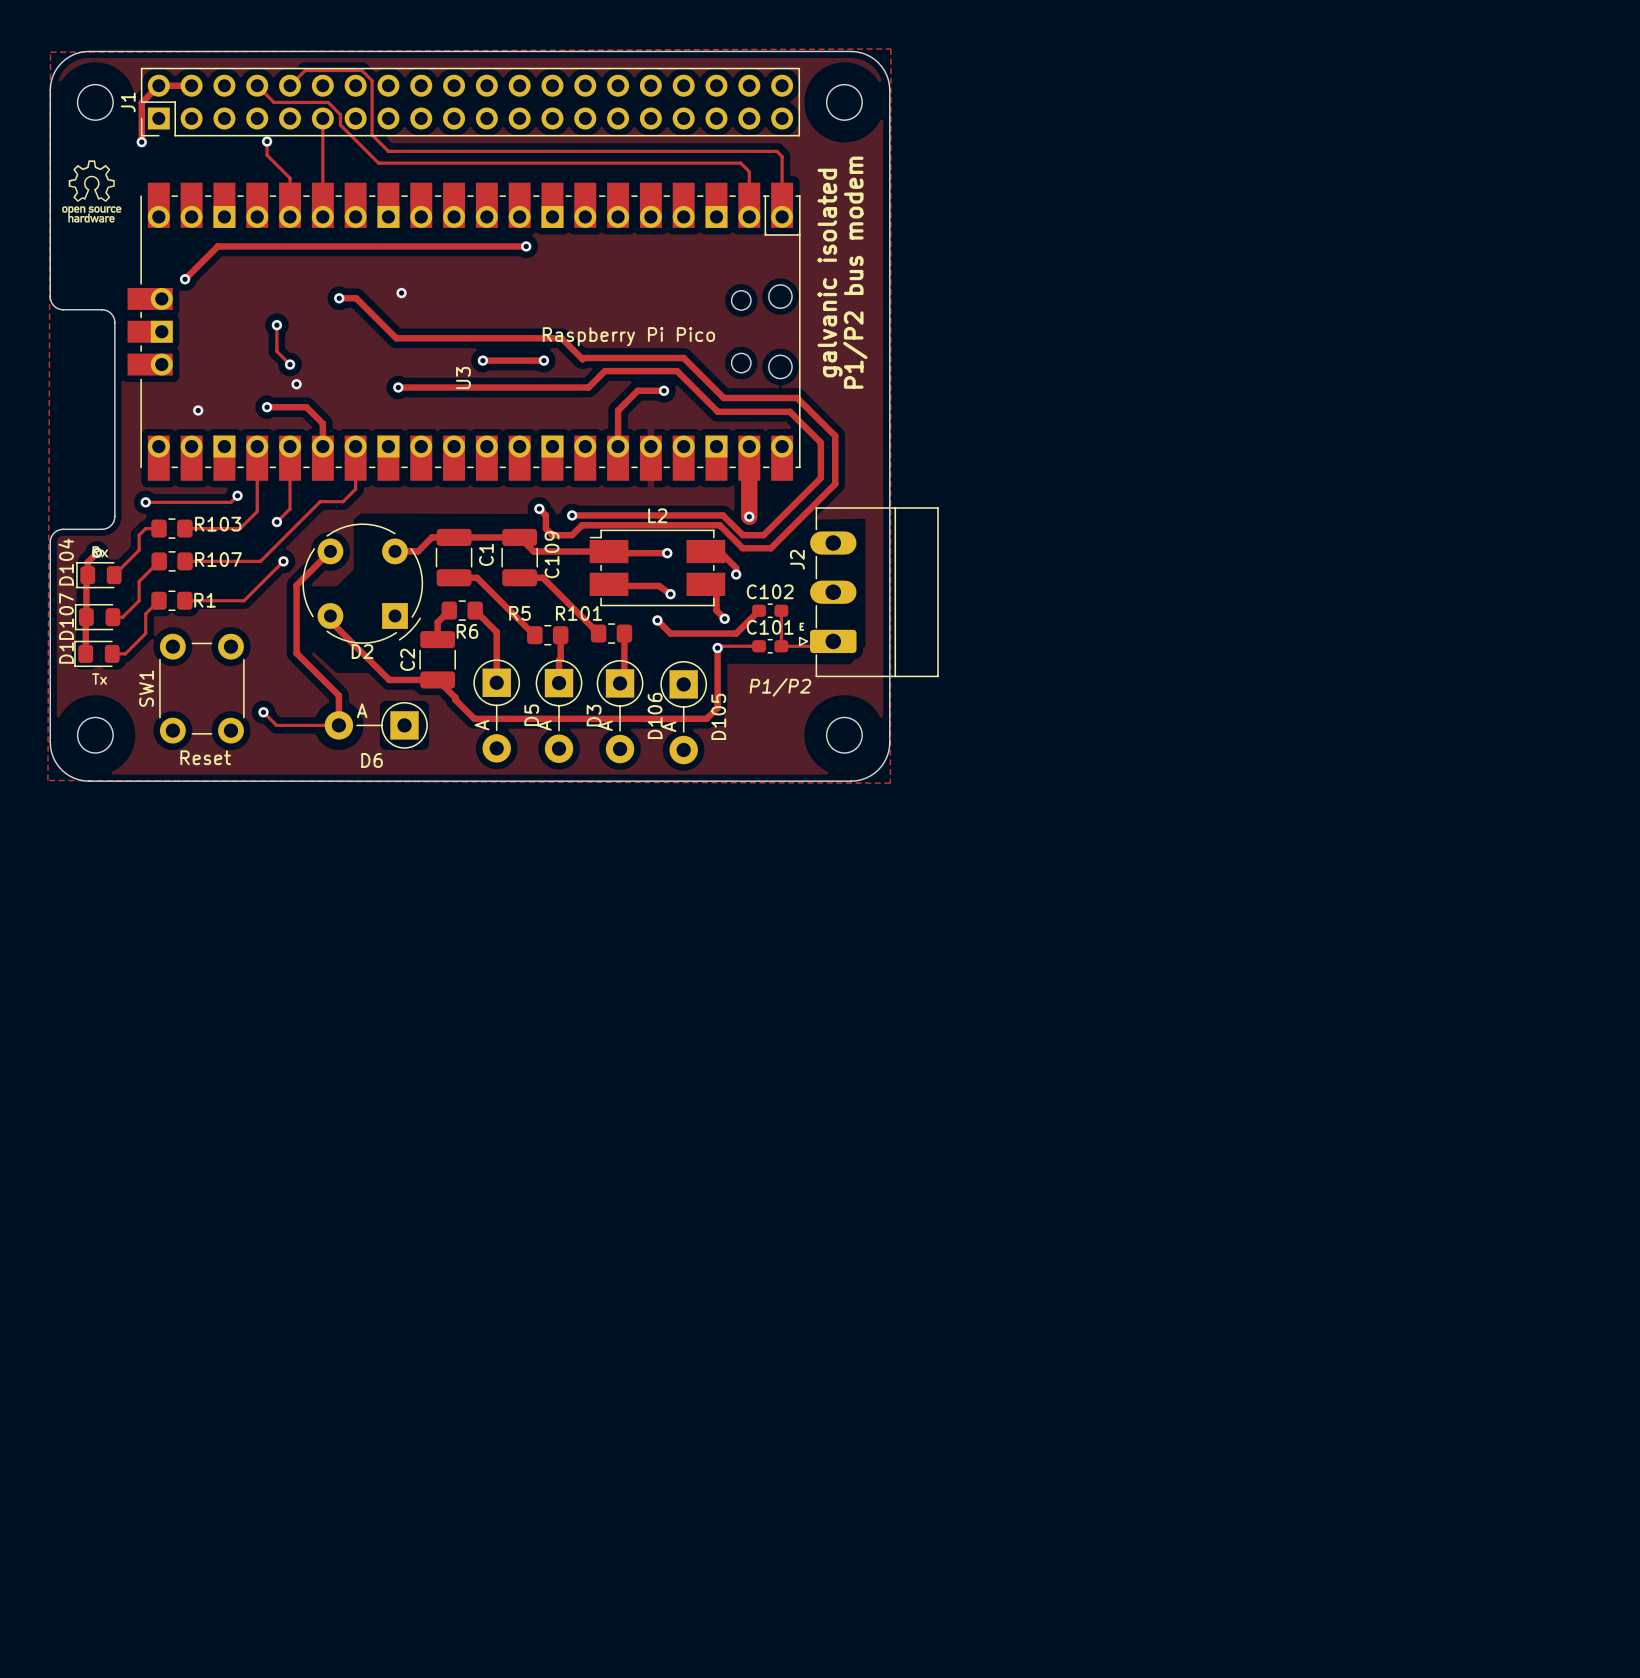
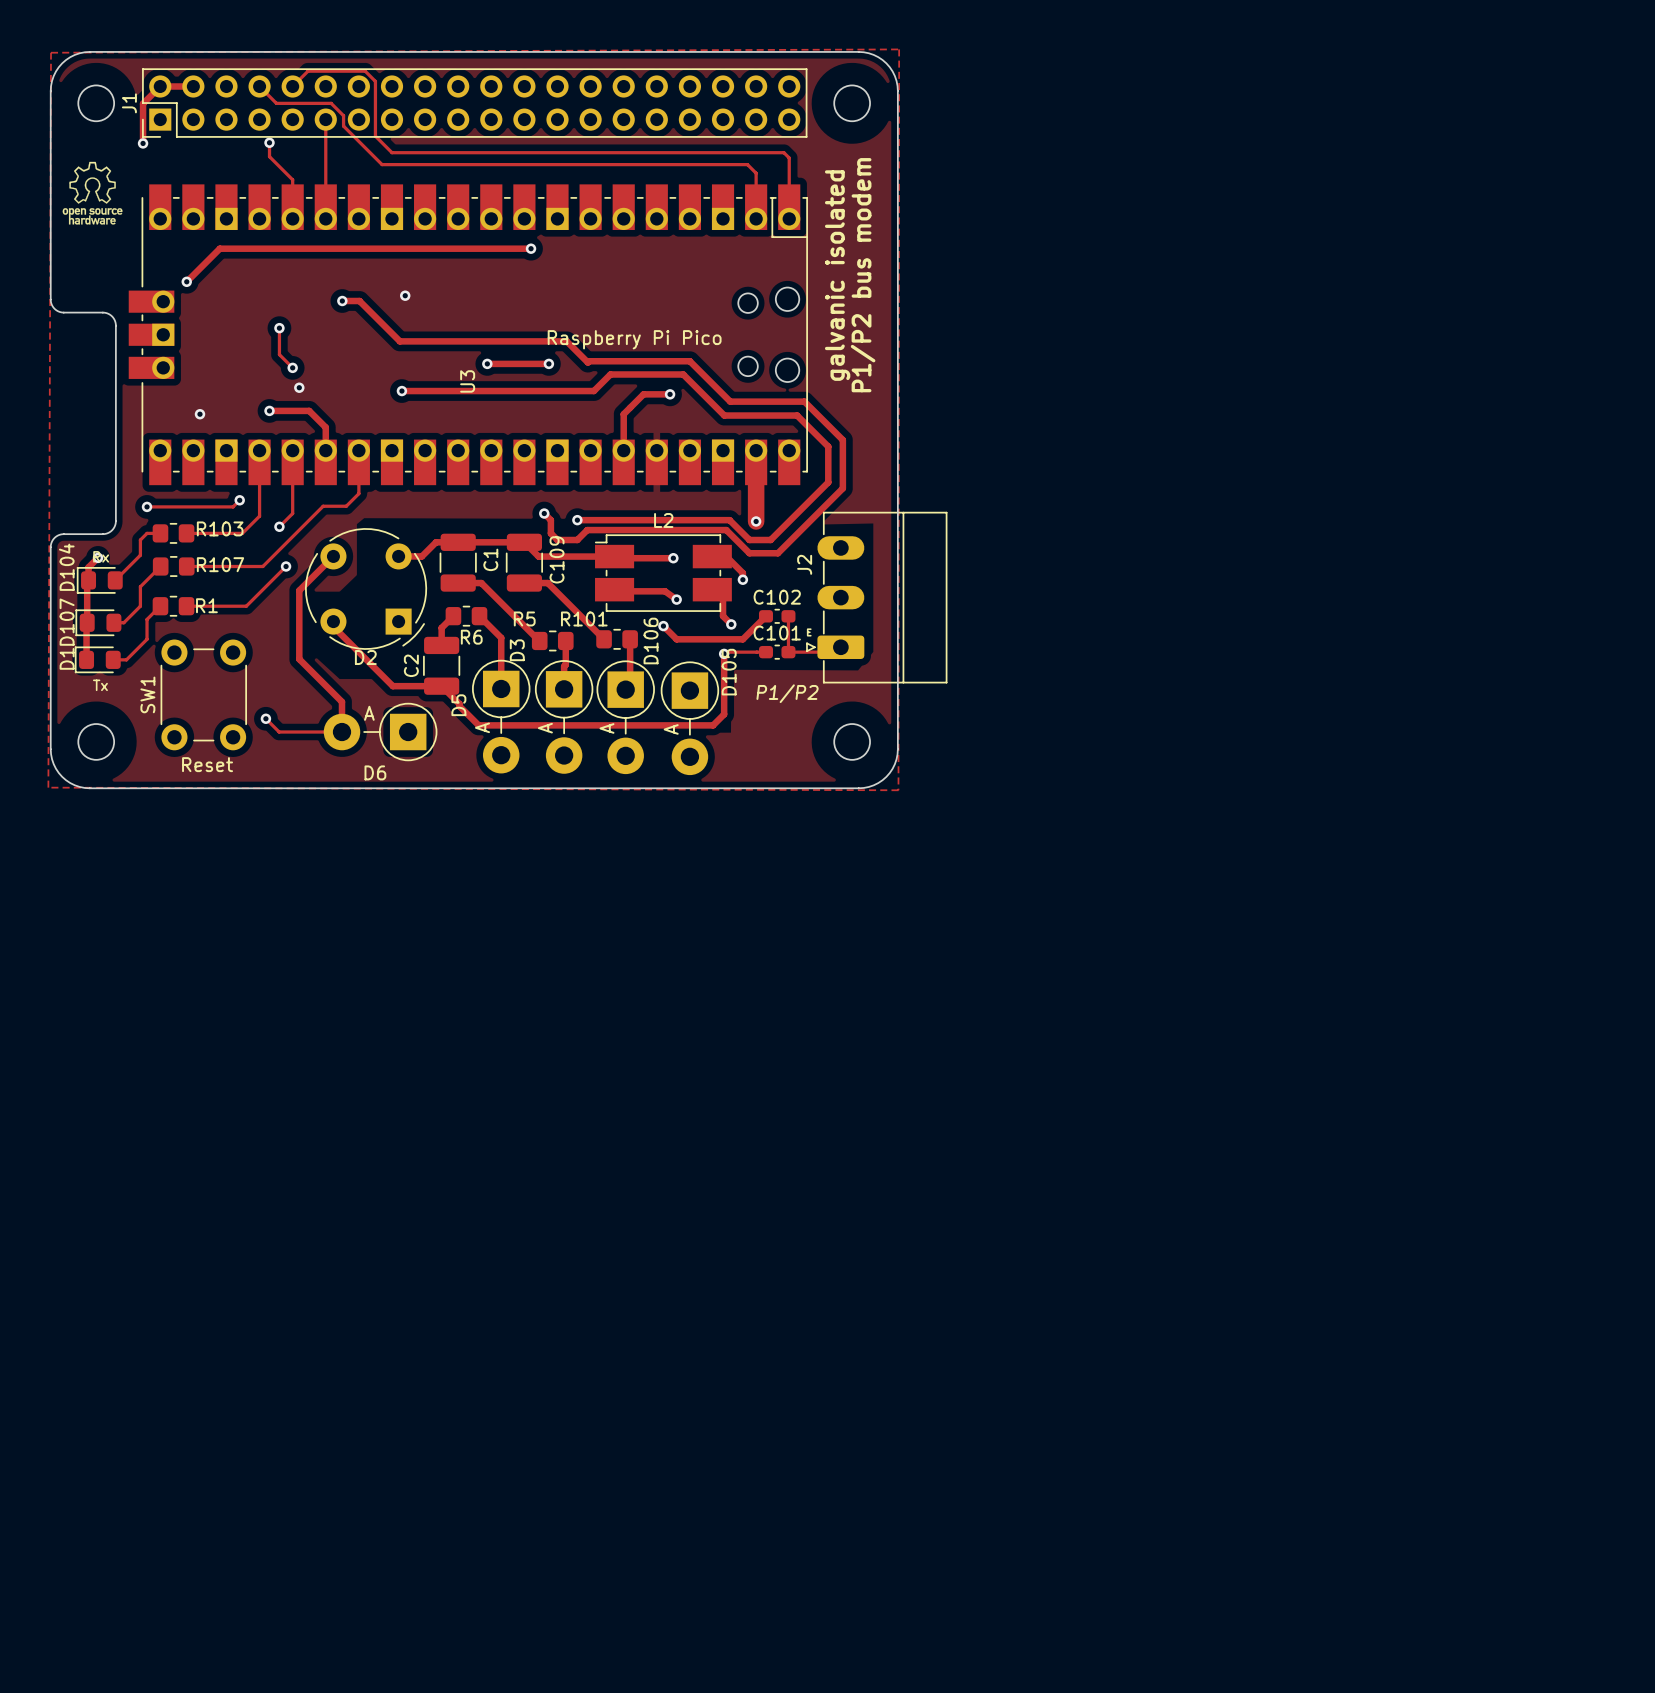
D5 footprint: [473, 659, 521, 763] -> [472, 659, 531, 774]
D3 footprint: [535, 659, 583, 763] -> [535, 660, 594, 774]
D106 footprint: [596, 660, 644, 764] -> [596, 660, 655, 775]
D105 footprint: [660, 661, 708, 765] -> [660, 661, 720, 776]
D6 footprint: [324, 702, 428, 749] -> [323, 702, 438, 762]
D5 name position: D5 (531, 715) -> D5 (458, 705)
D3 name position: D3 (594, 715) -> D3 (517, 650)
D106 name position: D106 (655, 715) -> D106 (651, 641)
D105 name position: D105 (718, 716) -> D105 (729, 672)

